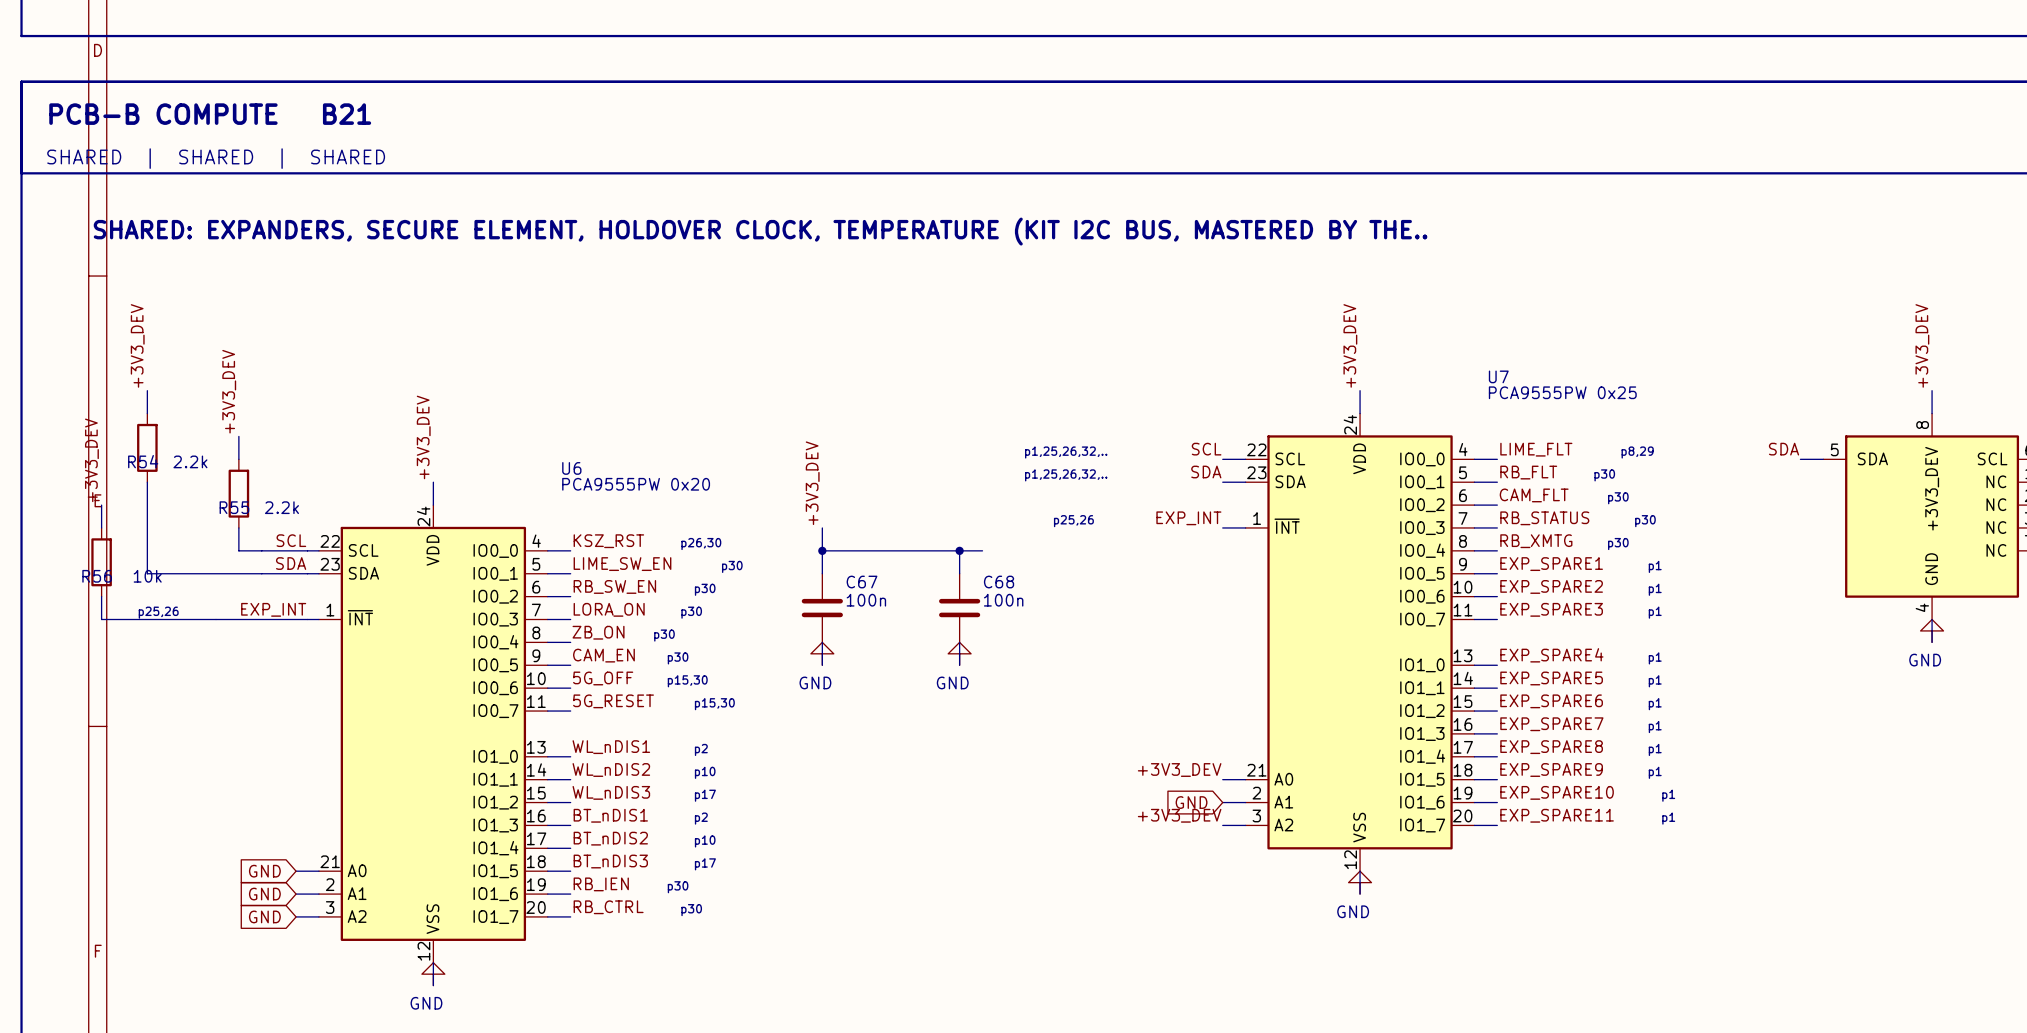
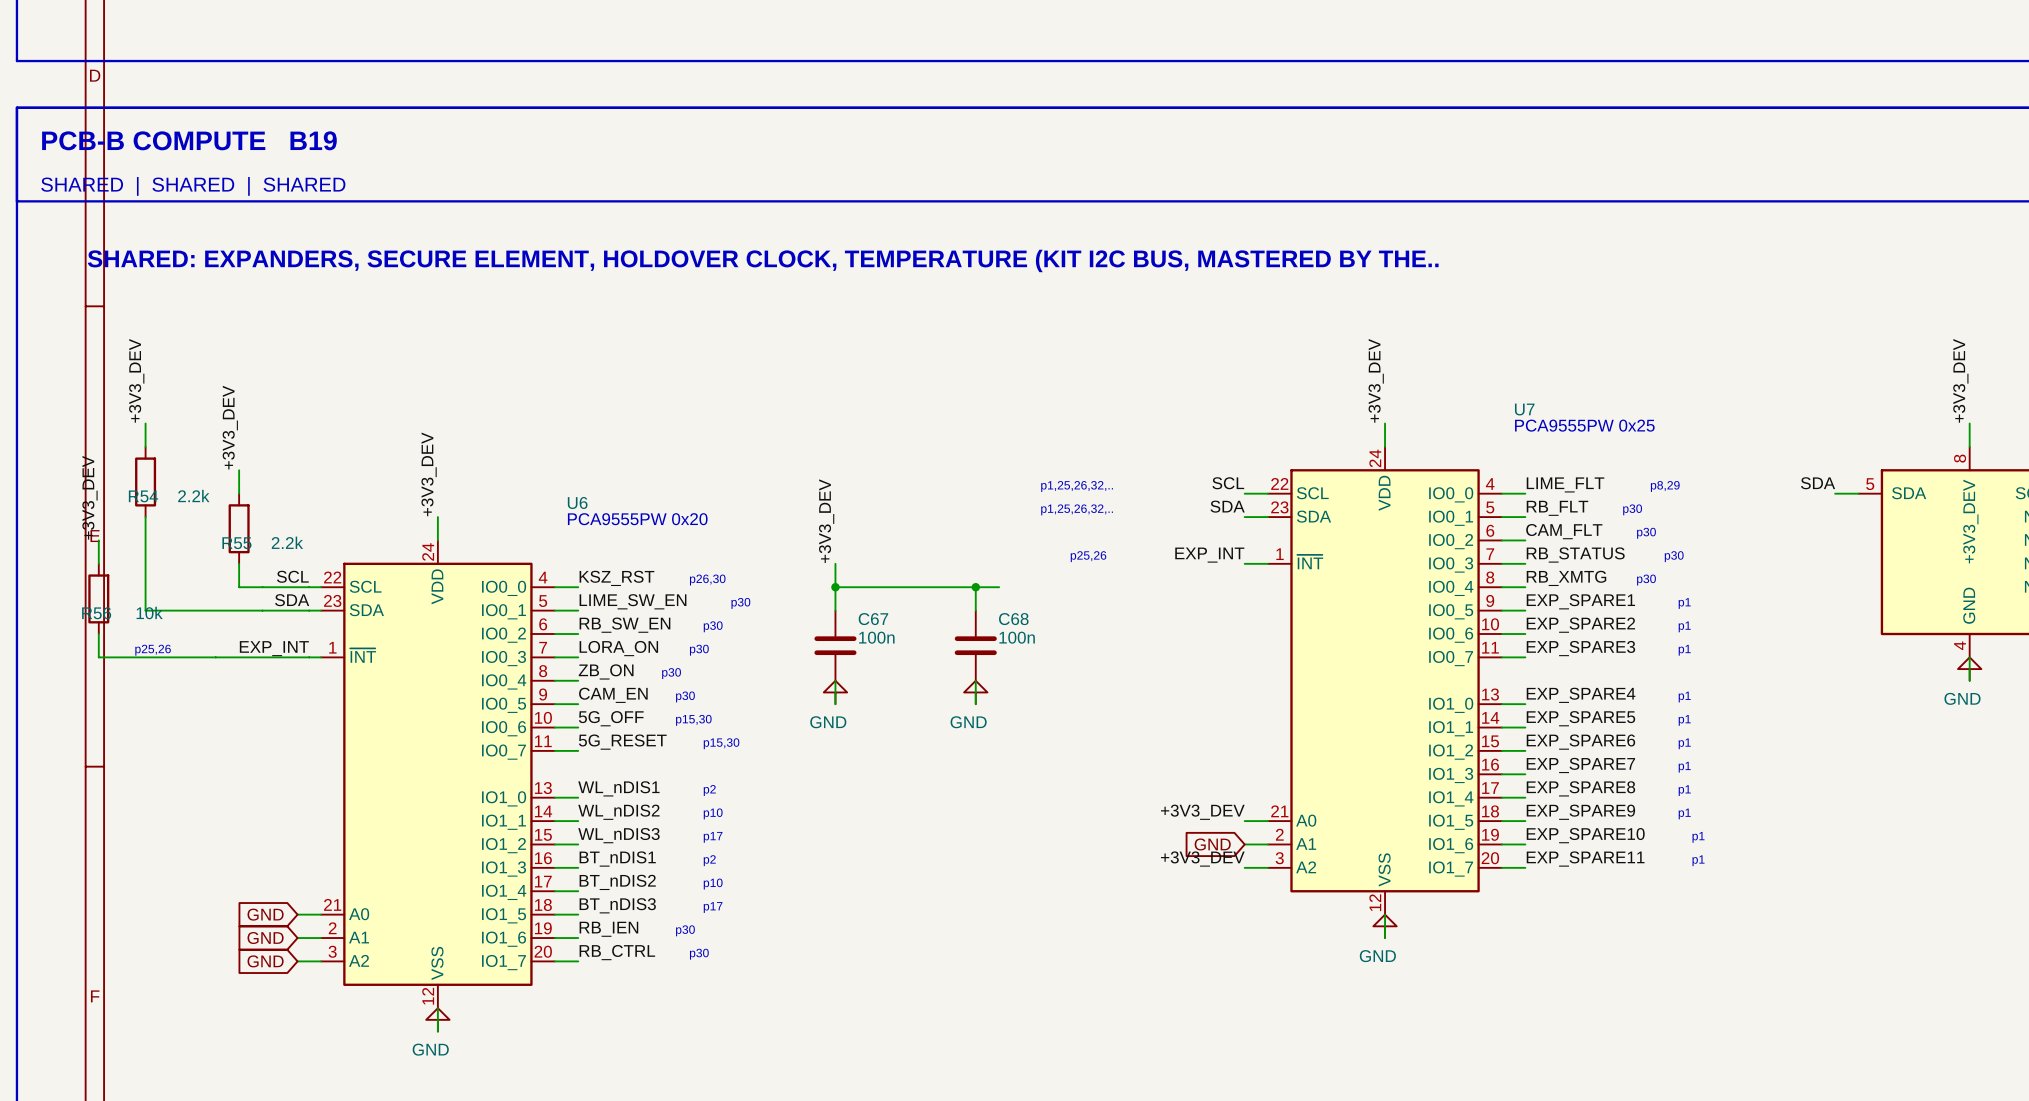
text: PCB-B COMPUTE B21 (210, 114) -> PCB-B COMPUTE B19 (189, 140)

